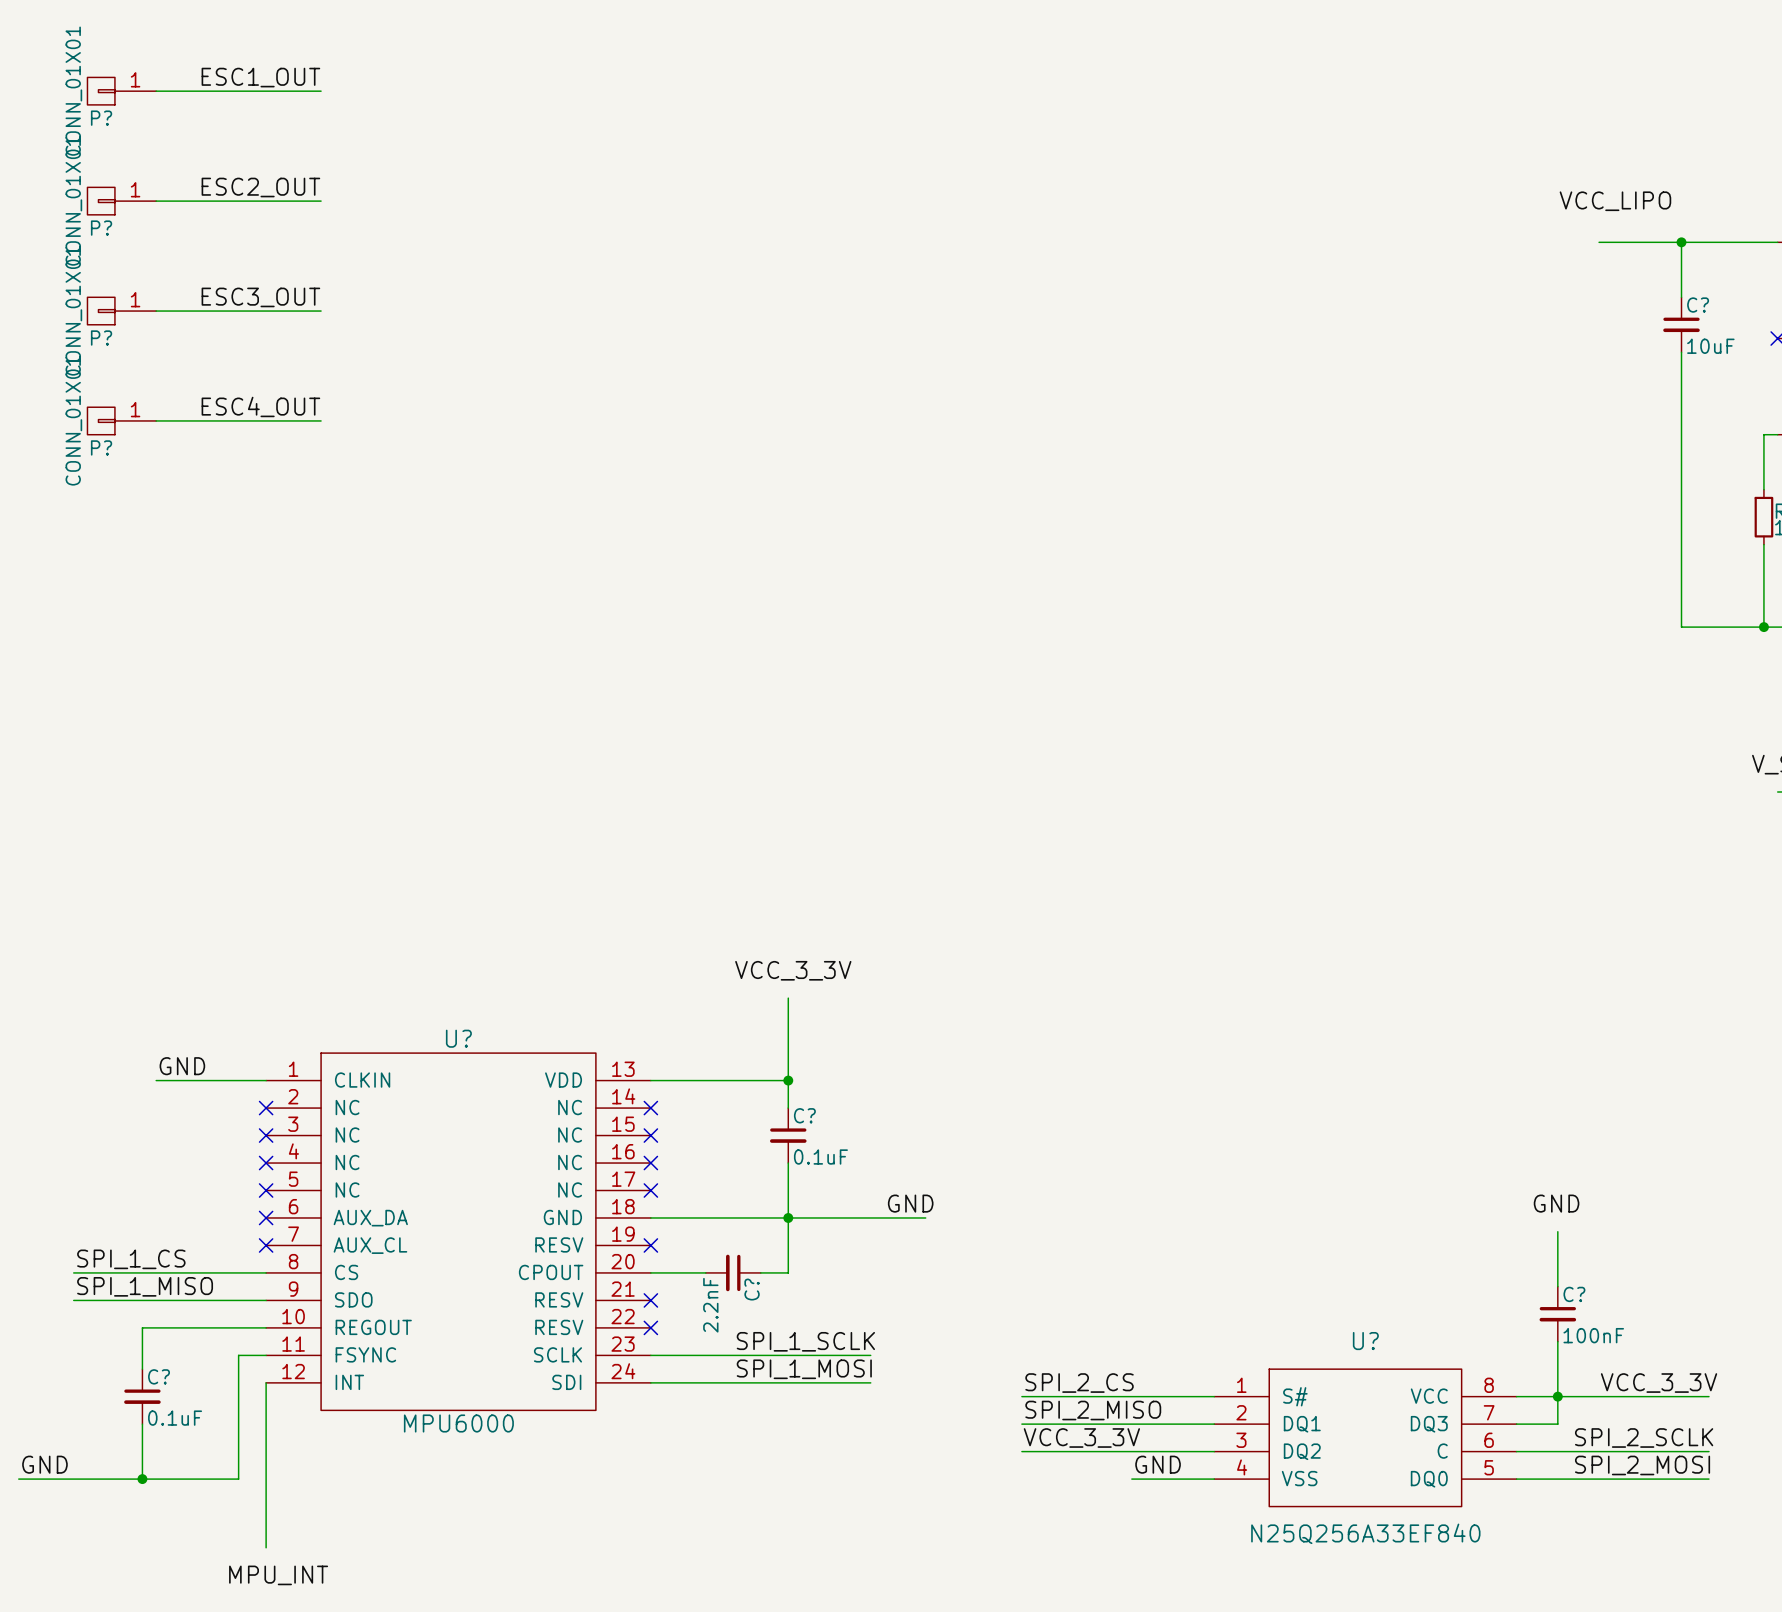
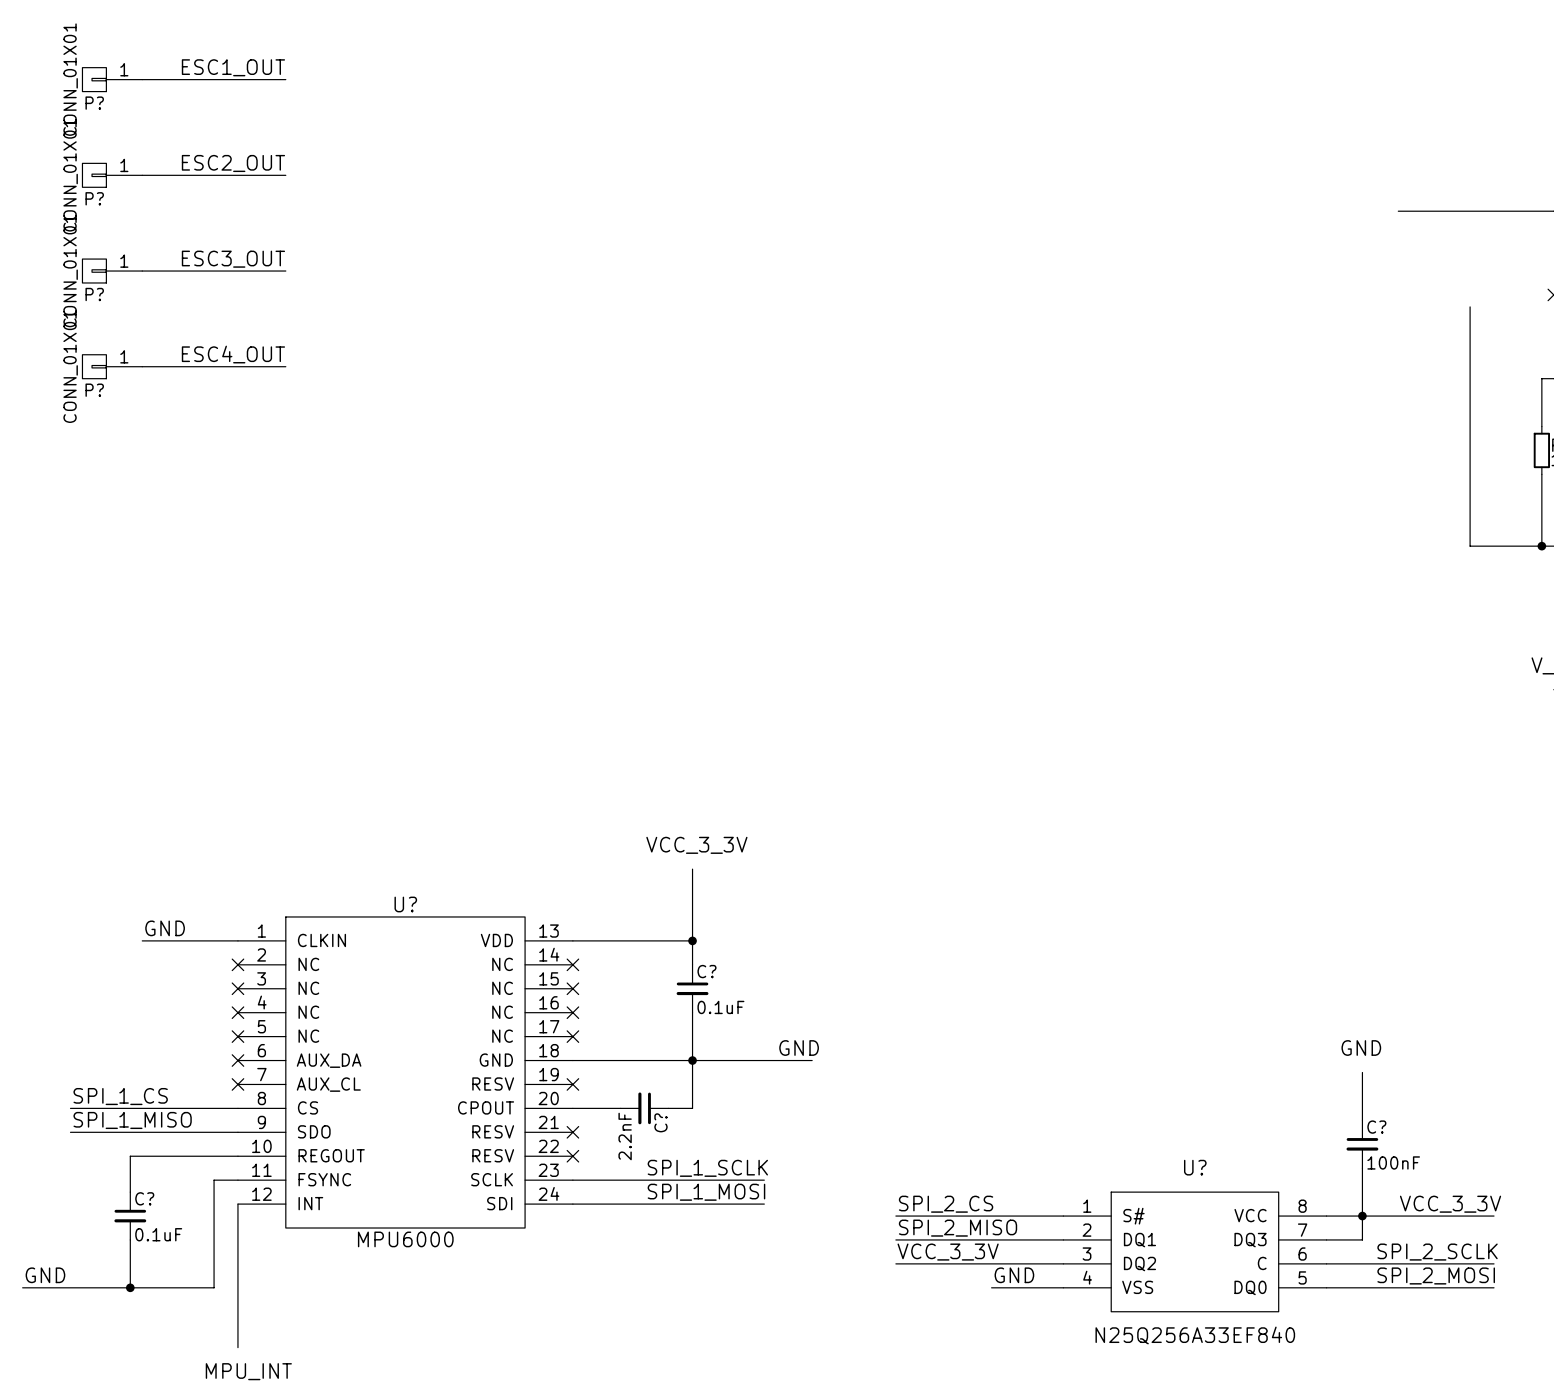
label: VCC_LIPO (1615, 201) -> none
wire: (1681, 242) (1681, 297) -> none
junction: (1681, 242) -> none
C?: 10uF (1681, 324) -> none

